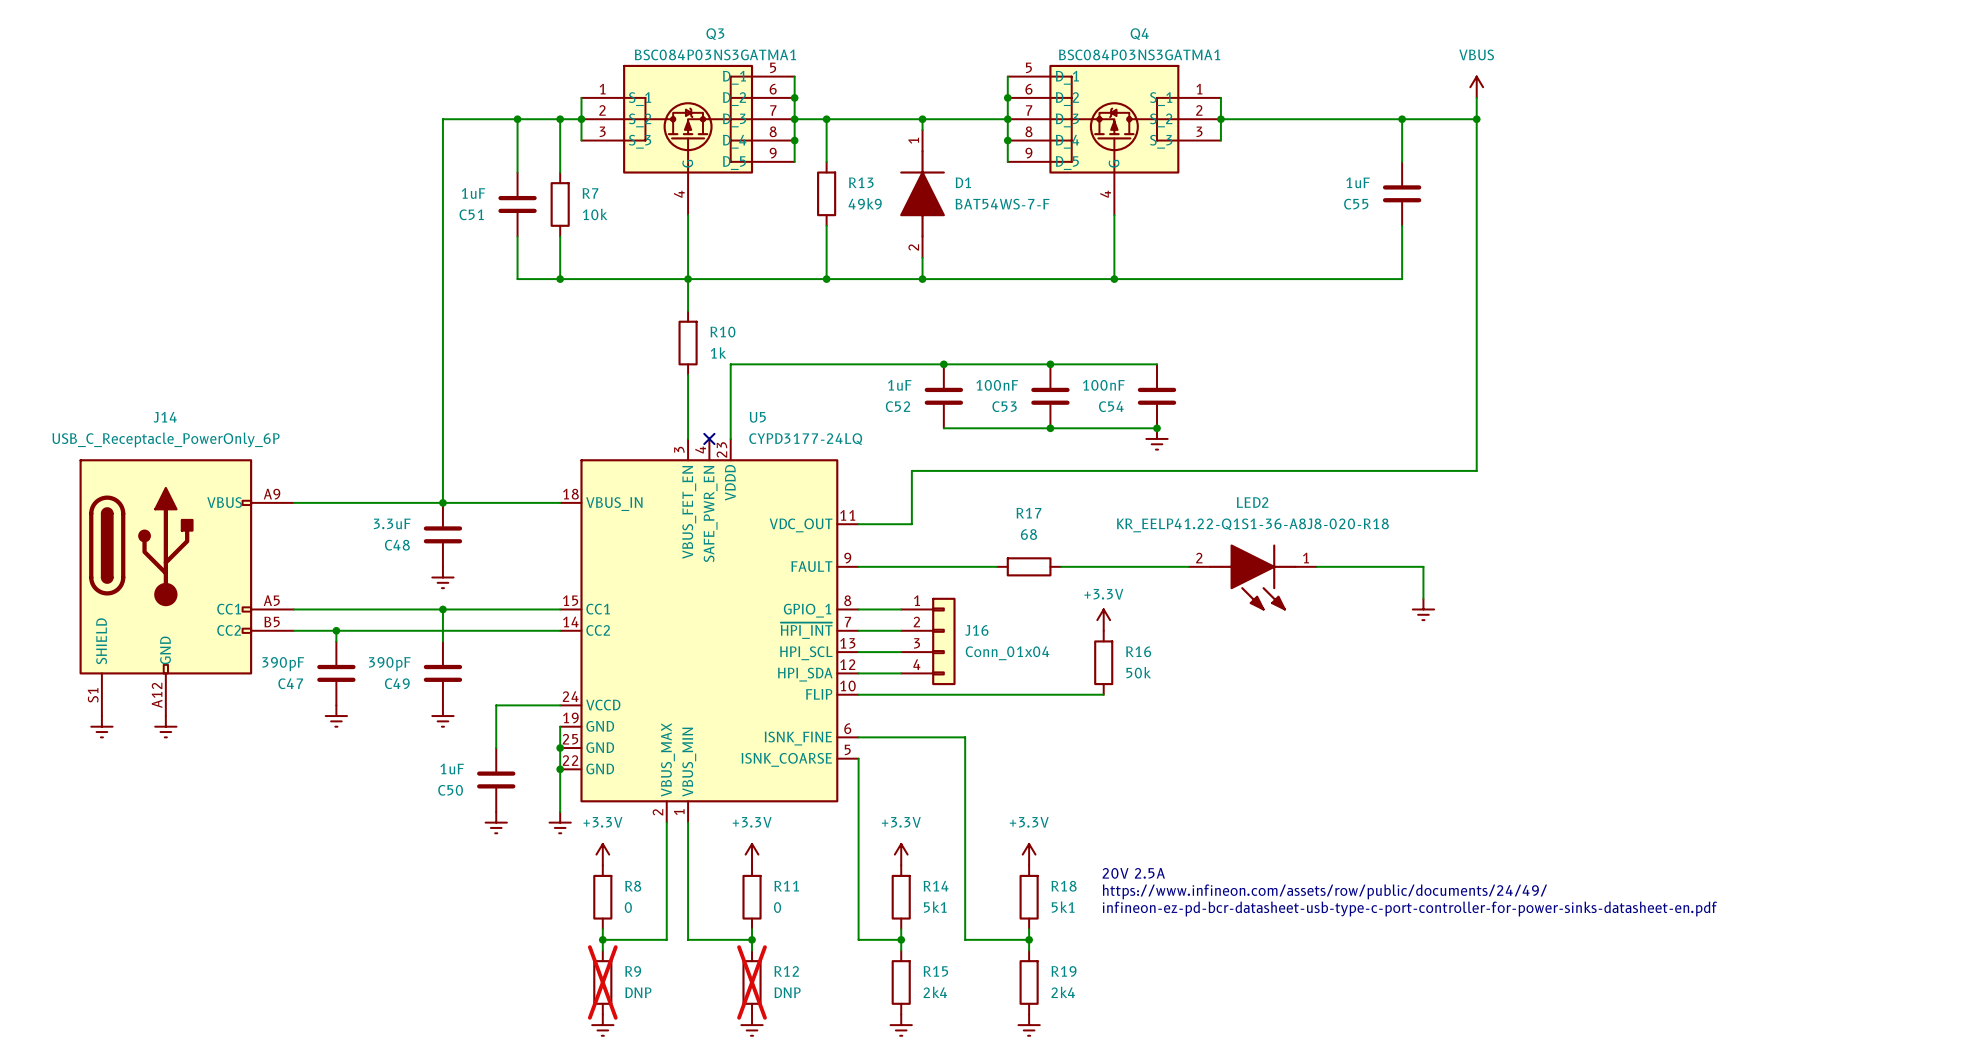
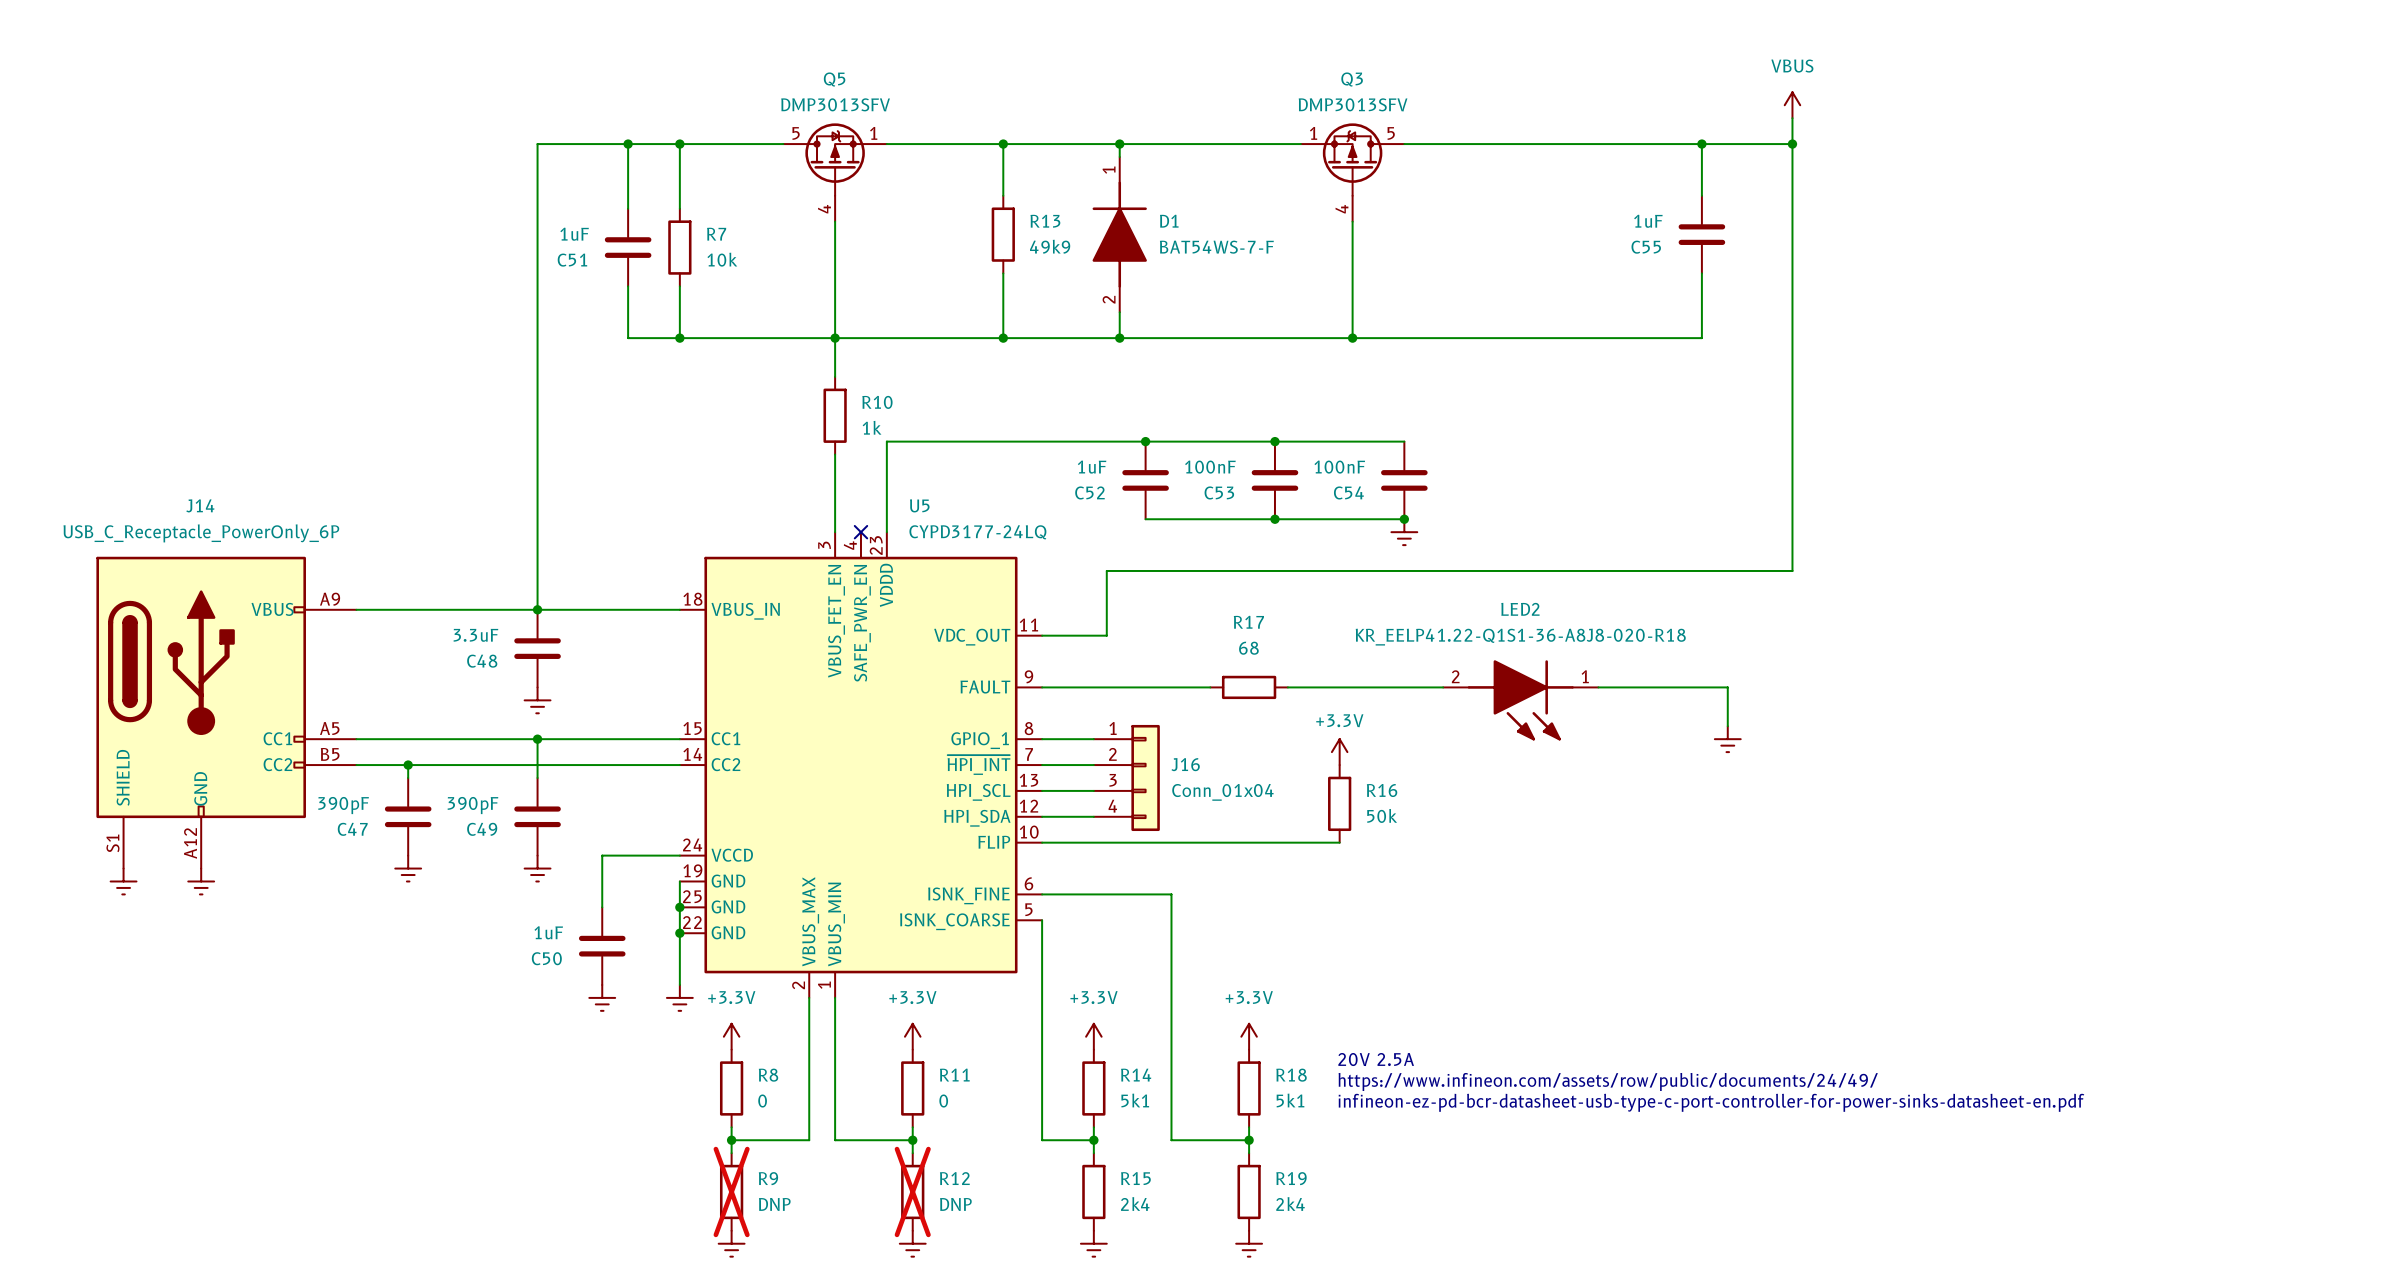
Q3 name position: Q3 (715, 34) -> Q3 (1352, 79)
Q3 value: BSC084P03NS3GATMA1 (715, 54) -> DMP3013SFV (1353, 104)
Q3 symbol: [581, 64, 795, 216] -> [1300, 123, 1405, 222]
wire: (794, 76) (794, 161) -> none
wire: (1007, 76) (1007, 161) -> none
wire: (581, 97) (581, 140) -> none
junction: (794, 97) -> none
junction: (1007, 97) -> none
wire: (1220, 97) (1220, 140) -> none
junction: (581, 119) -> none
junction: (794, 119) -> none
junction: (1007, 119) -> none
junction: (1220, 119) -> none
junction: (794, 140) -> none
junction: (1007, 140) -> none
Q4: BSC084P03NS3GATMA1 (1114, 140) -> none
Q5: none -> DMP3013SFV (835, 172)

